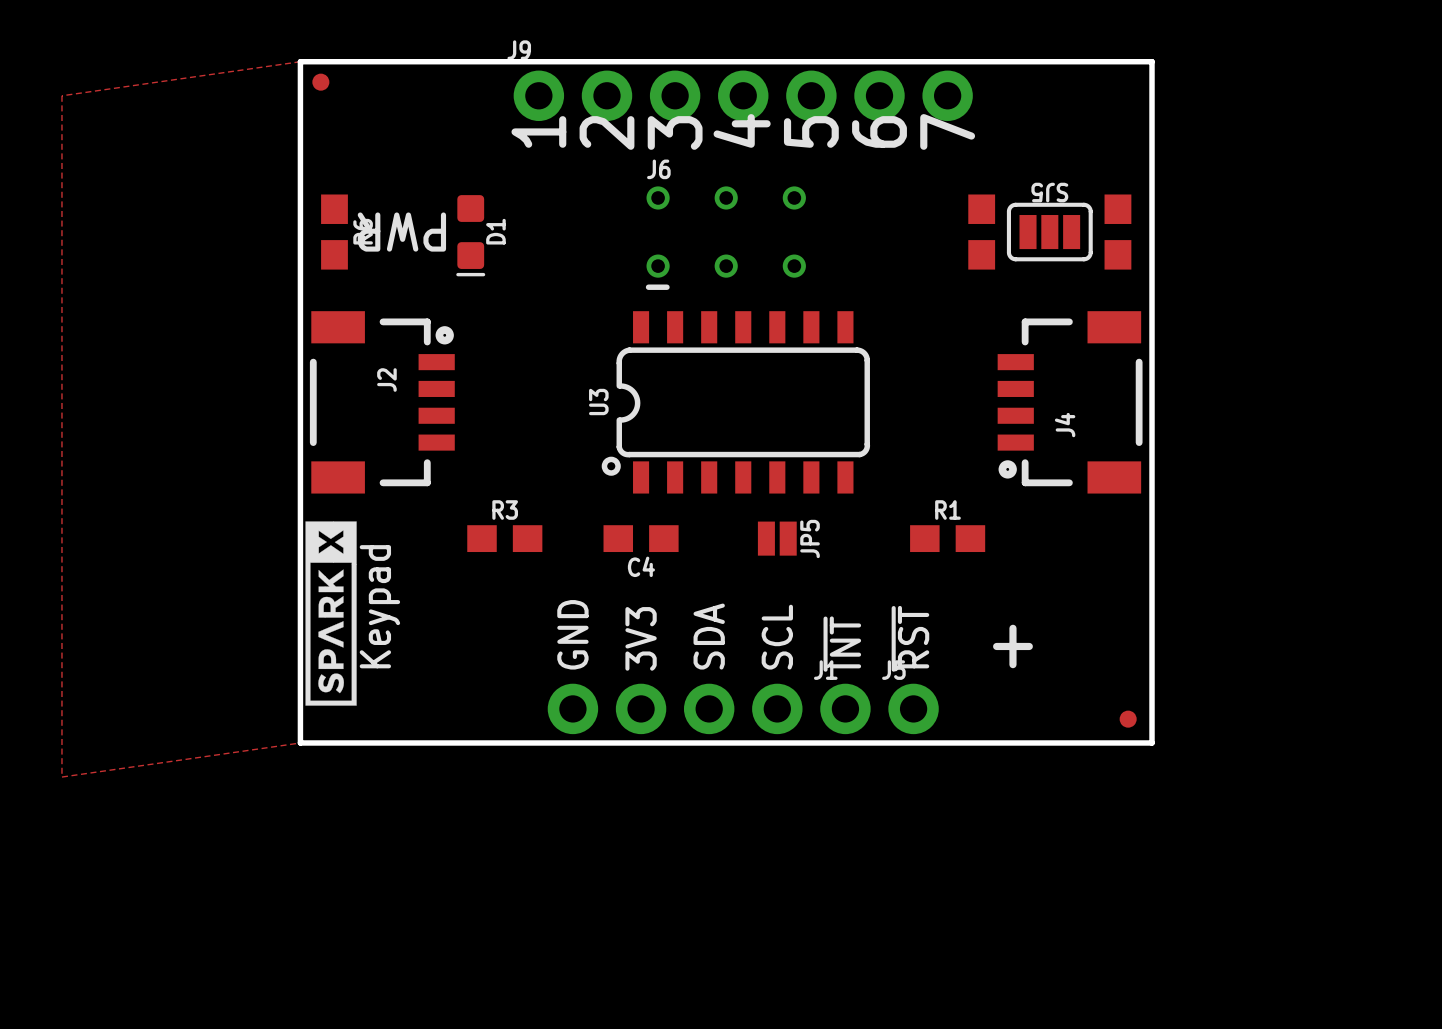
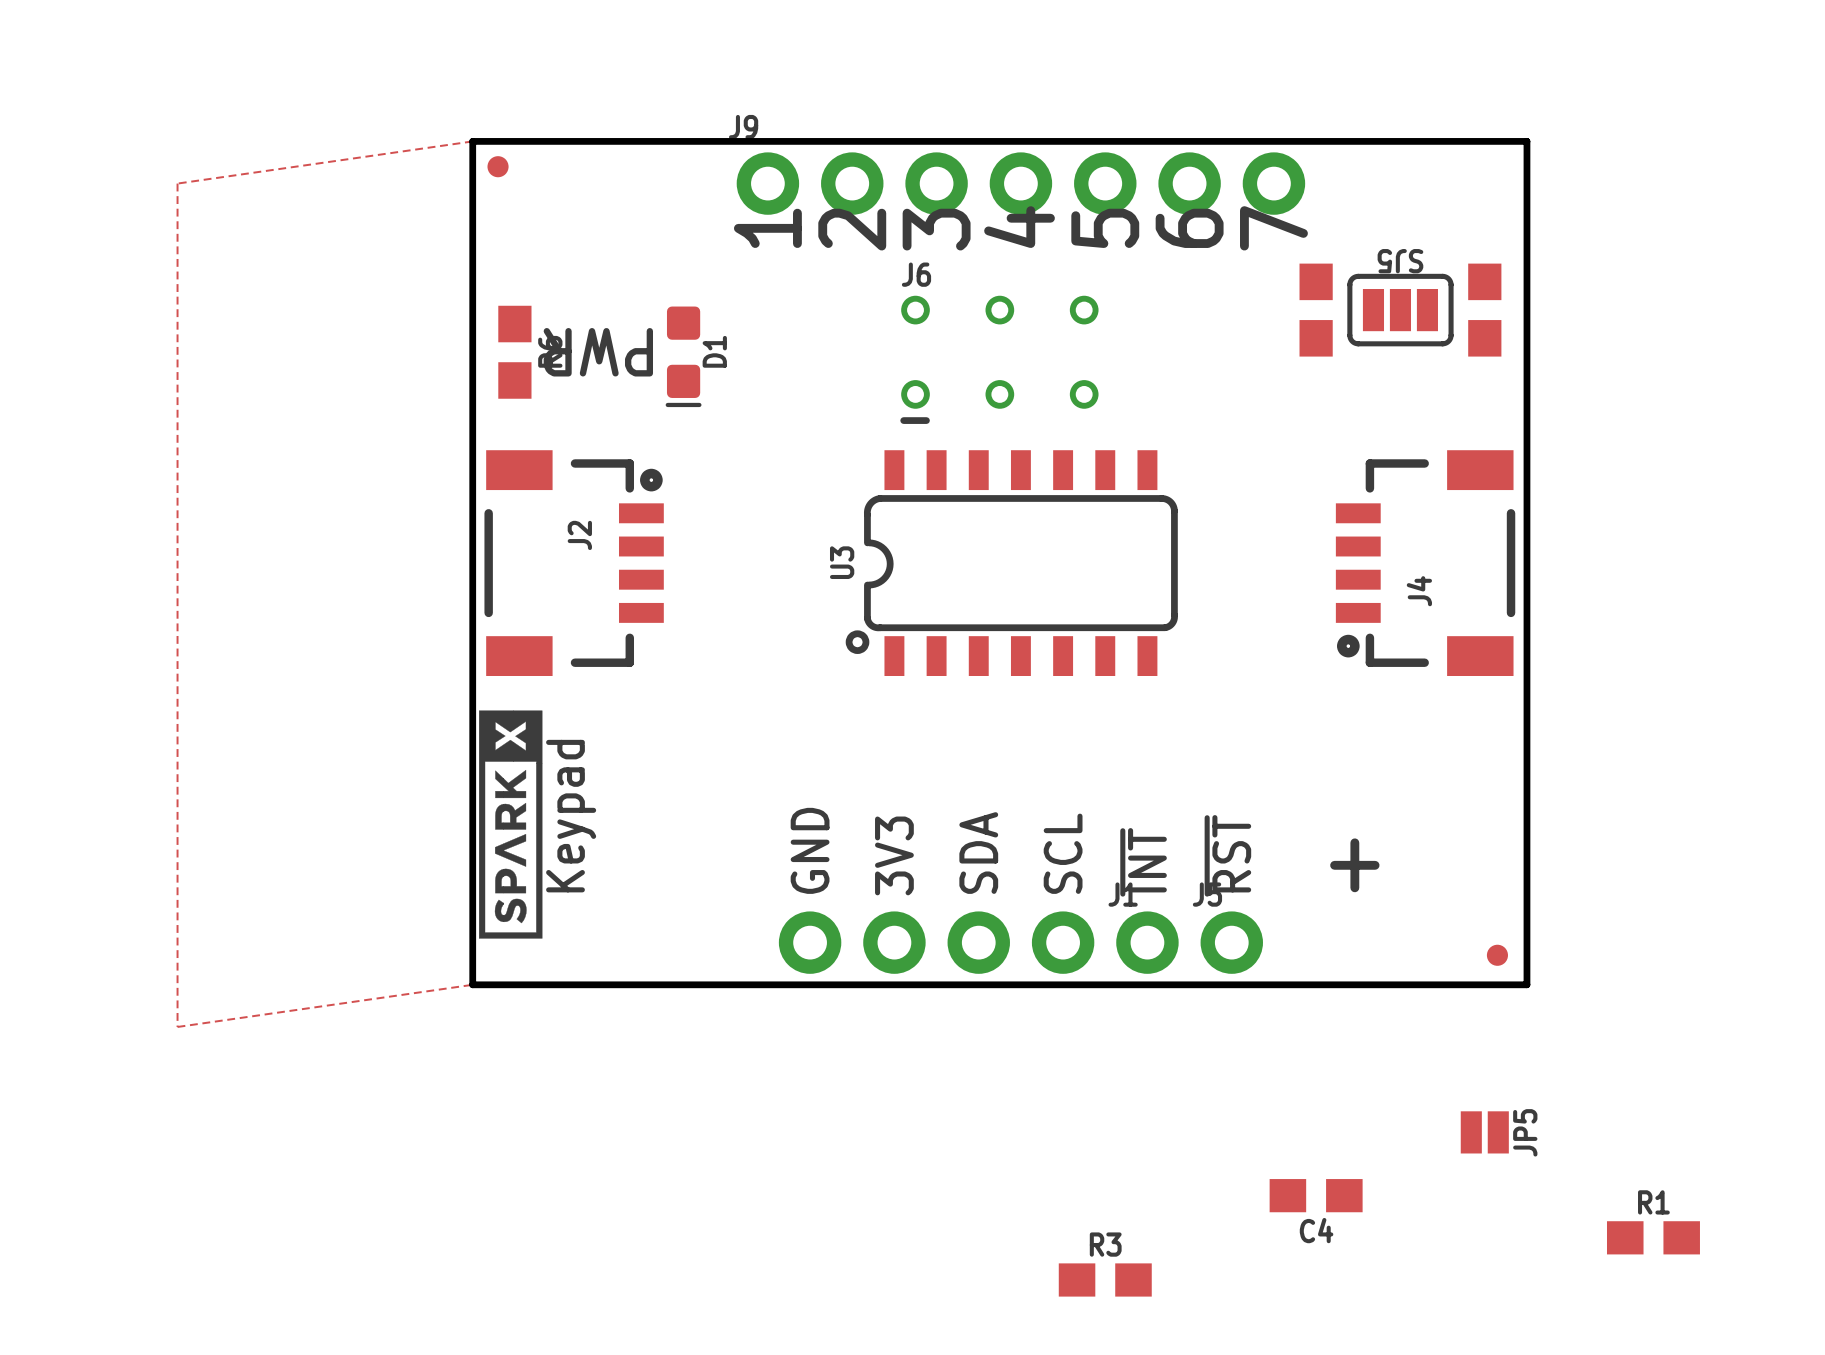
part position: (981, 232) -> (1316, 310)
SJ5 position: (1049, 232) -> (1400, 310)
part position: (1117, 232) -> (1484, 310)
R3 position: (504, 538) -> (1105, 1279)
C4 position: (641, 538) -> (1316, 1195)
JP5 position: (777, 538) -> (1484, 1132)
R1 position: (947, 538) -> (1653, 1237)

